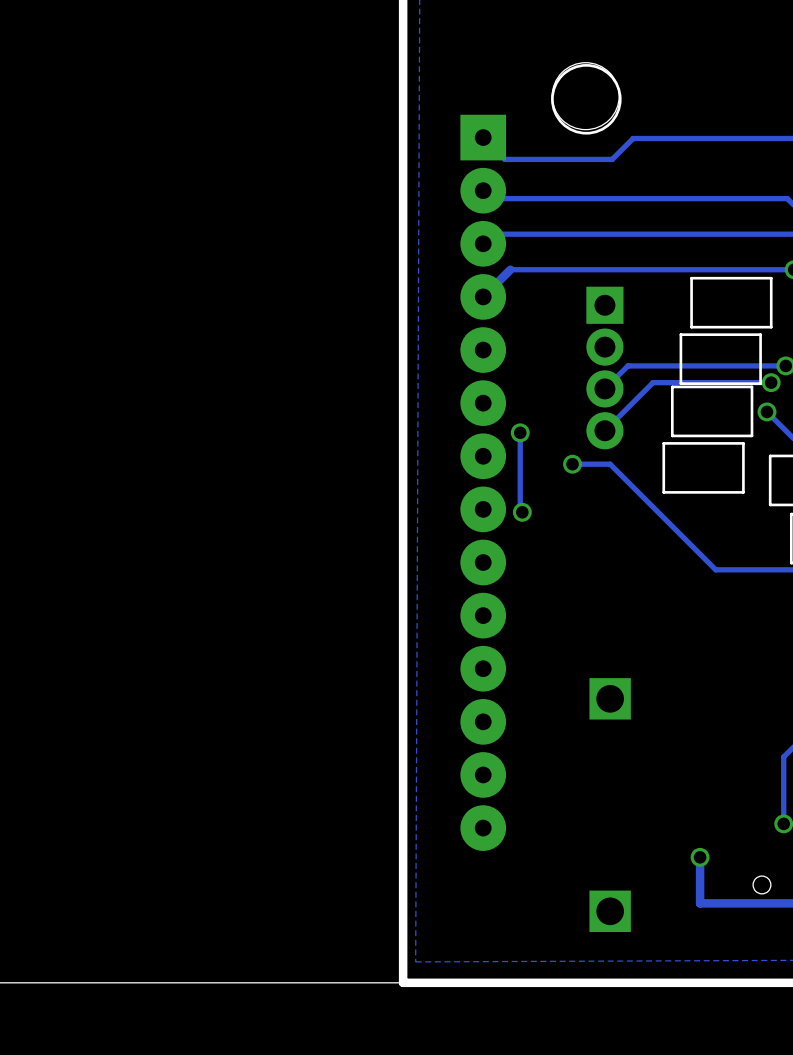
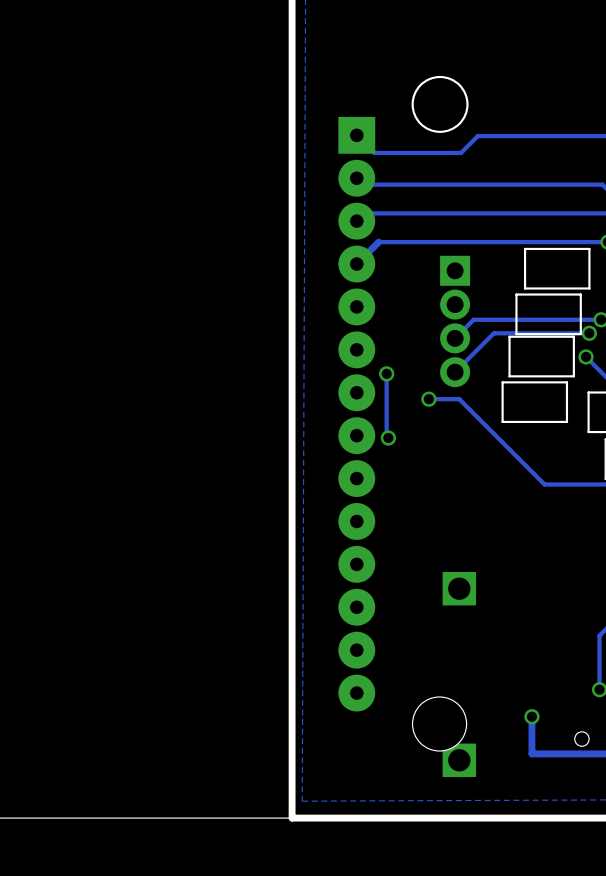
part: (541, 456) -> none
part: none -> (403, 413)

